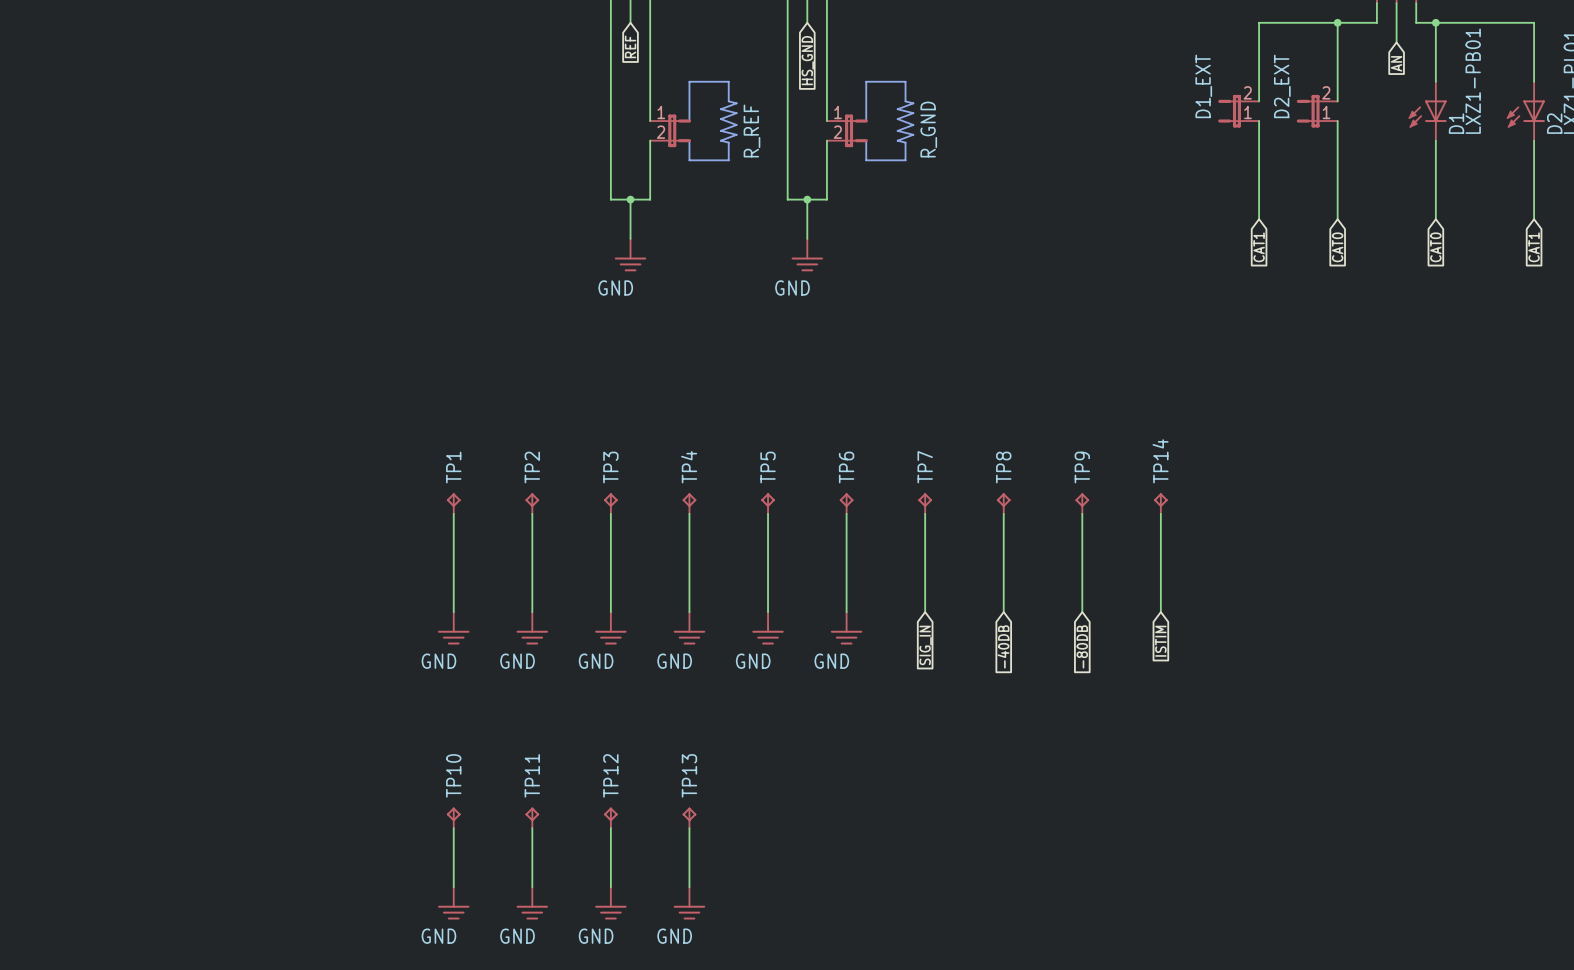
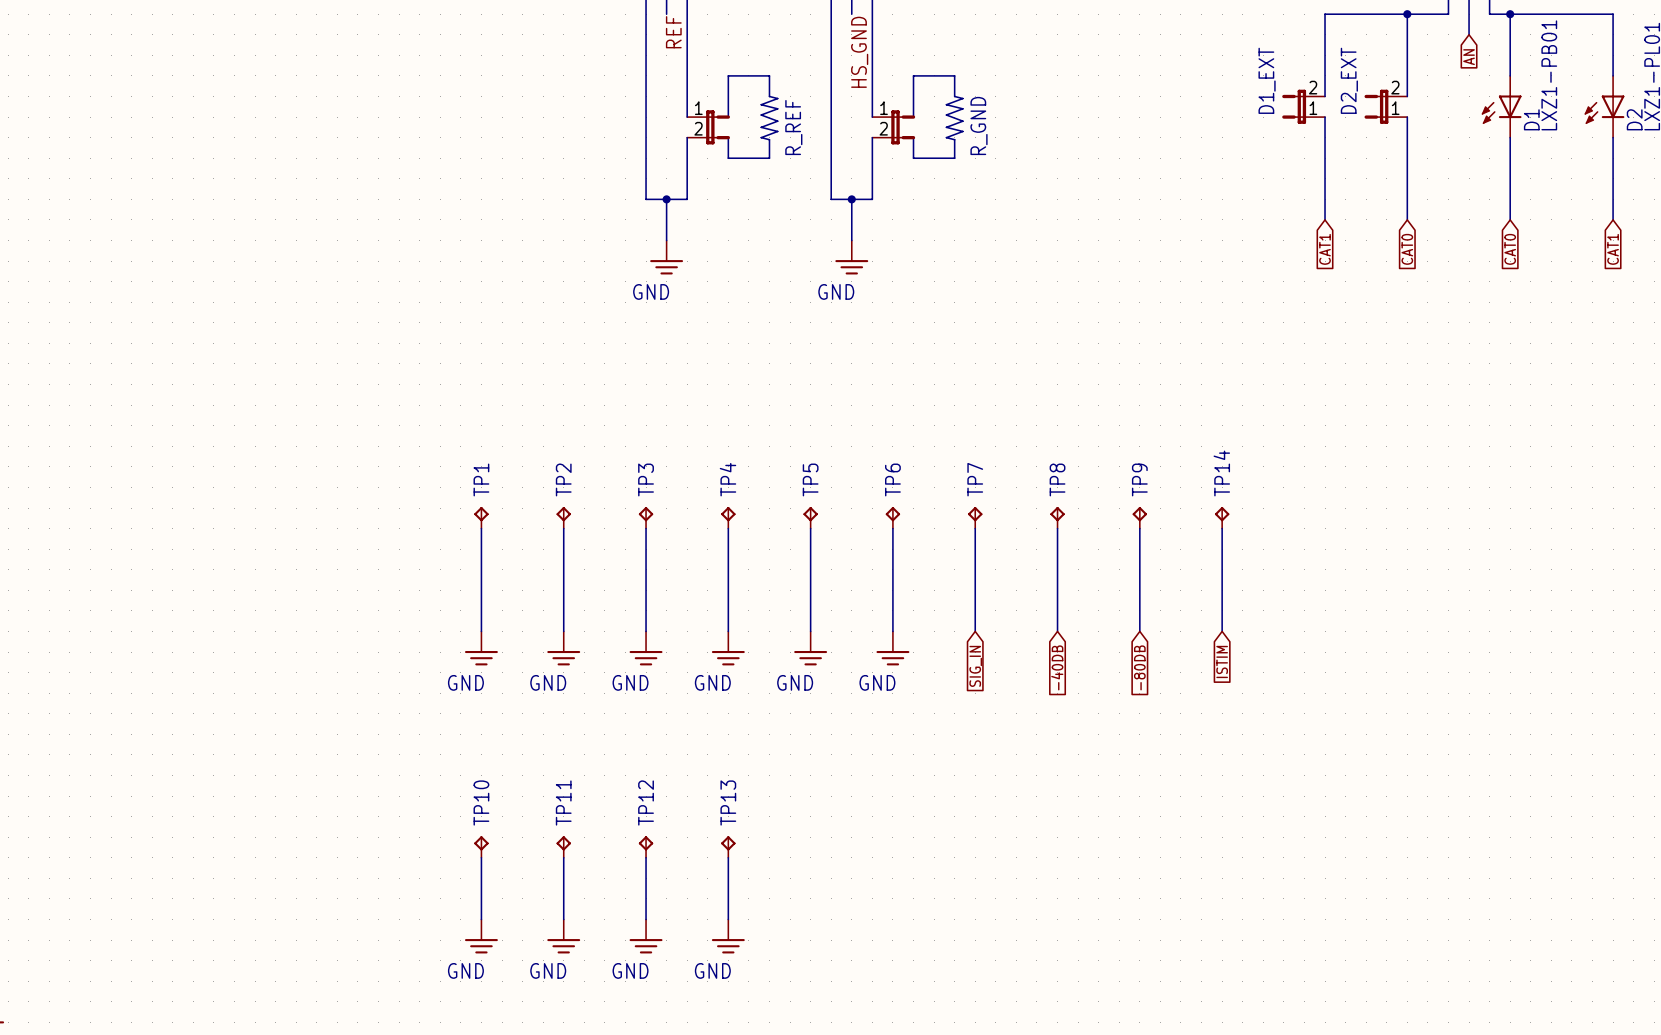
label: none -> REF (673, 32)
global label: REF (630, 46) -> none
label: none -> HS_GND (859, 52)
global label: HS_GND (807, 60) -> none

